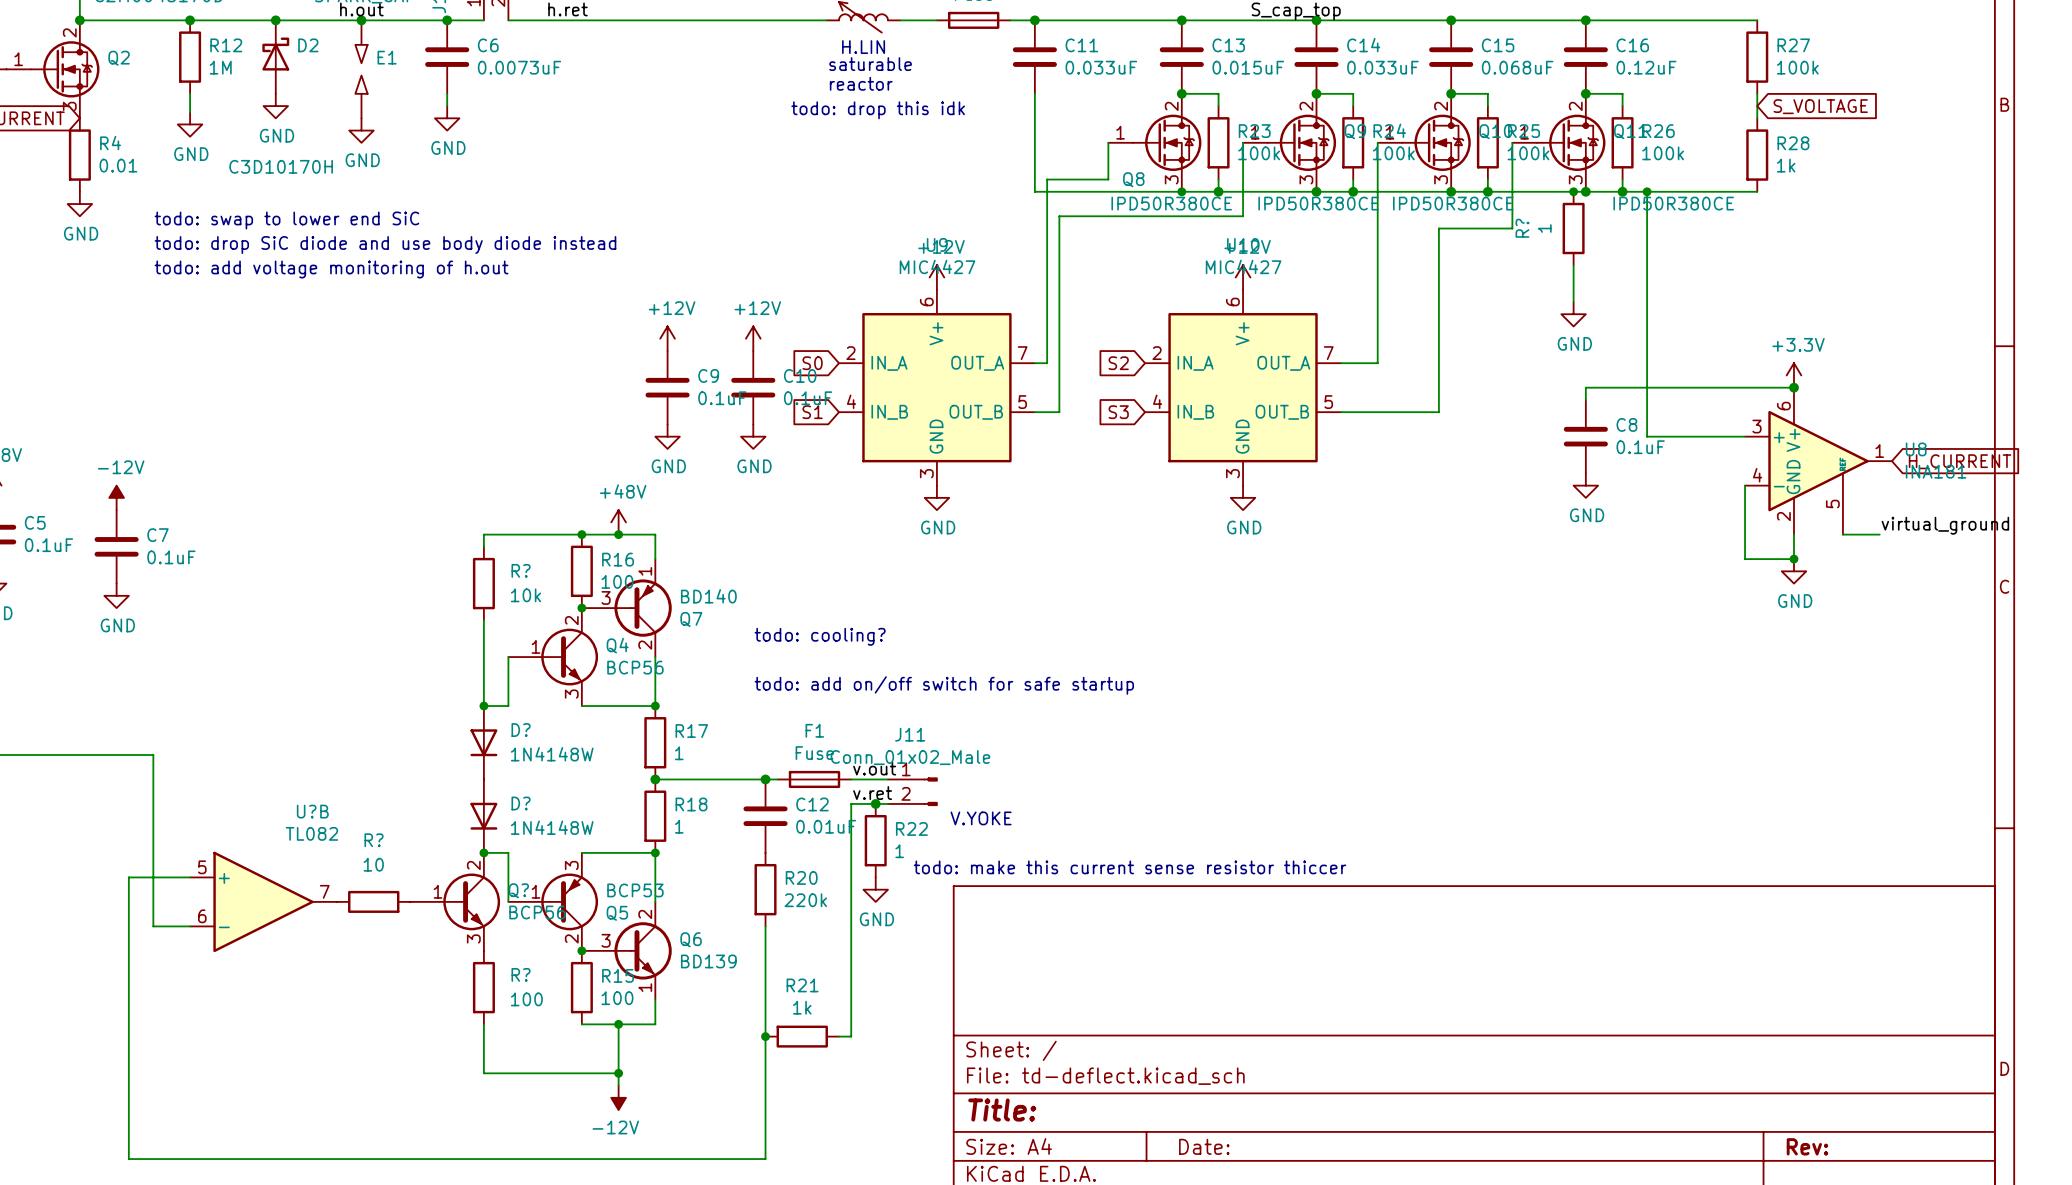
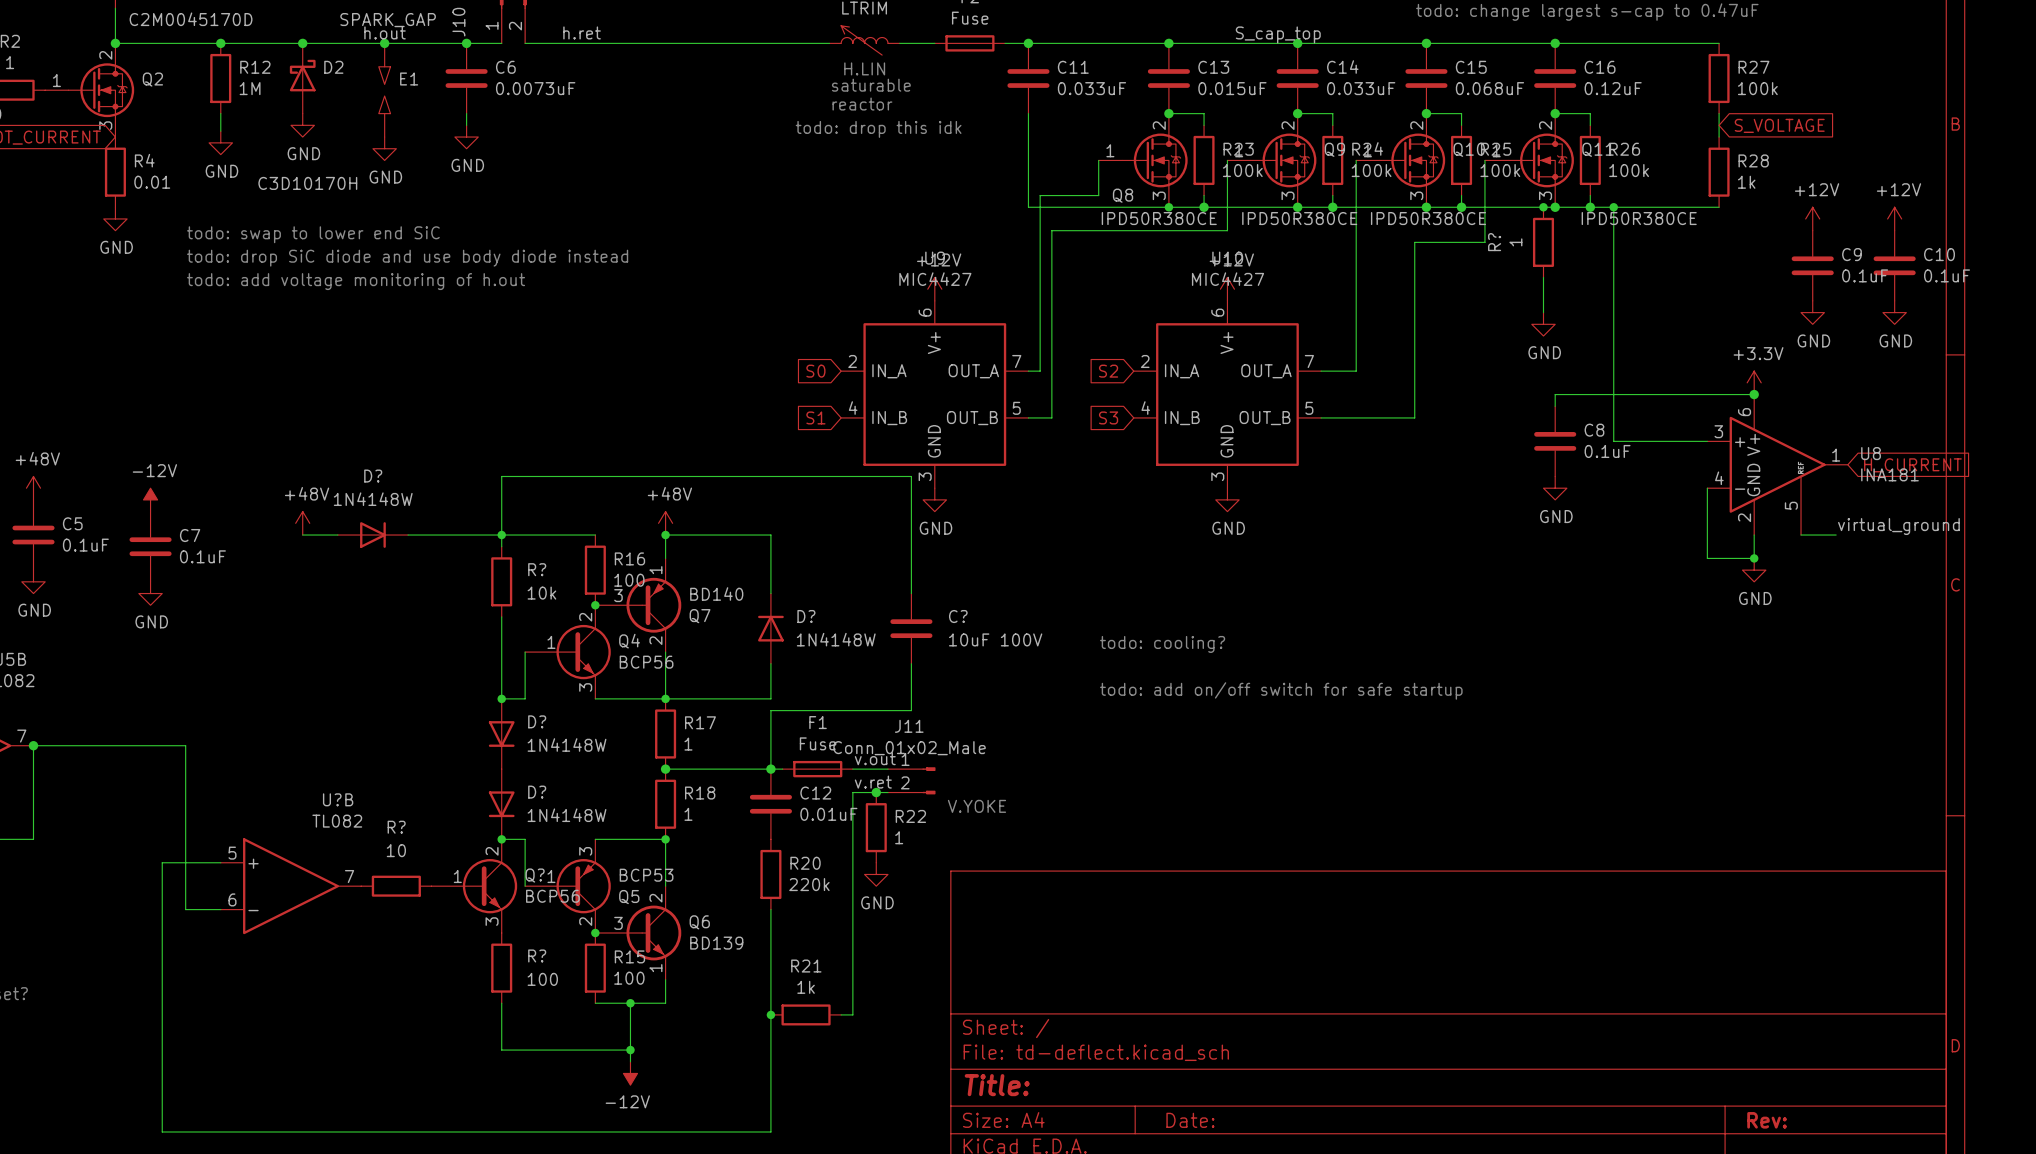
power symbol: none -> +12V (1812, 218)
power symbol: none -> +12V (1894, 218)
power symbol: none -> GND (1812, 312)
power symbol: none -> GND (1894, 312)
power symbol: +12V (667, 338) -> none
power symbol: +12V (753, 338) -> none
C9 position: (667, 387) -> (1812, 265)
C10 position: (753, 387) -> (1894, 265)
power symbol: GND (667, 436) -> none
power symbol: GND (753, 436) -> none
power symbol: none -> +48V (302, 523)
power symbol position: +48V (618, 522) -> +48V (665, 523)
wire: none -> (302, 535) (337, 535)
D?: none -> 1N4148W (372, 535)
wire: none -> (408, 535) (501, 535) (501, 476) (911, 476) (911, 593)
junction: none -> (501, 535)
wire: (581, 534) (655, 534) -> (770, 593) (770, 535) (665, 535)
junction: (581, 534) -> none
junction: (618, 534) -> none
junction: none -> (665, 535)
D?: none -> 1N4148W (770, 628)
C?: none -> 10uF 100V (911, 628)
text: todo: cooling? (820, 636) -> none
text: none -> todo: cooling? (1162, 644)
wire: none -> (770, 663) (770, 698) (665, 698)
wire: none -> (911, 663) (911, 710) (770, 710) (770, 769)
text: todo: add on/off switch for safe startup (944, 685) -> none
text: none -> todo: add on/off switch for safe startup (1281, 690)
text: todo: make this current sense resistor thiccer (1130, 867) -> none

